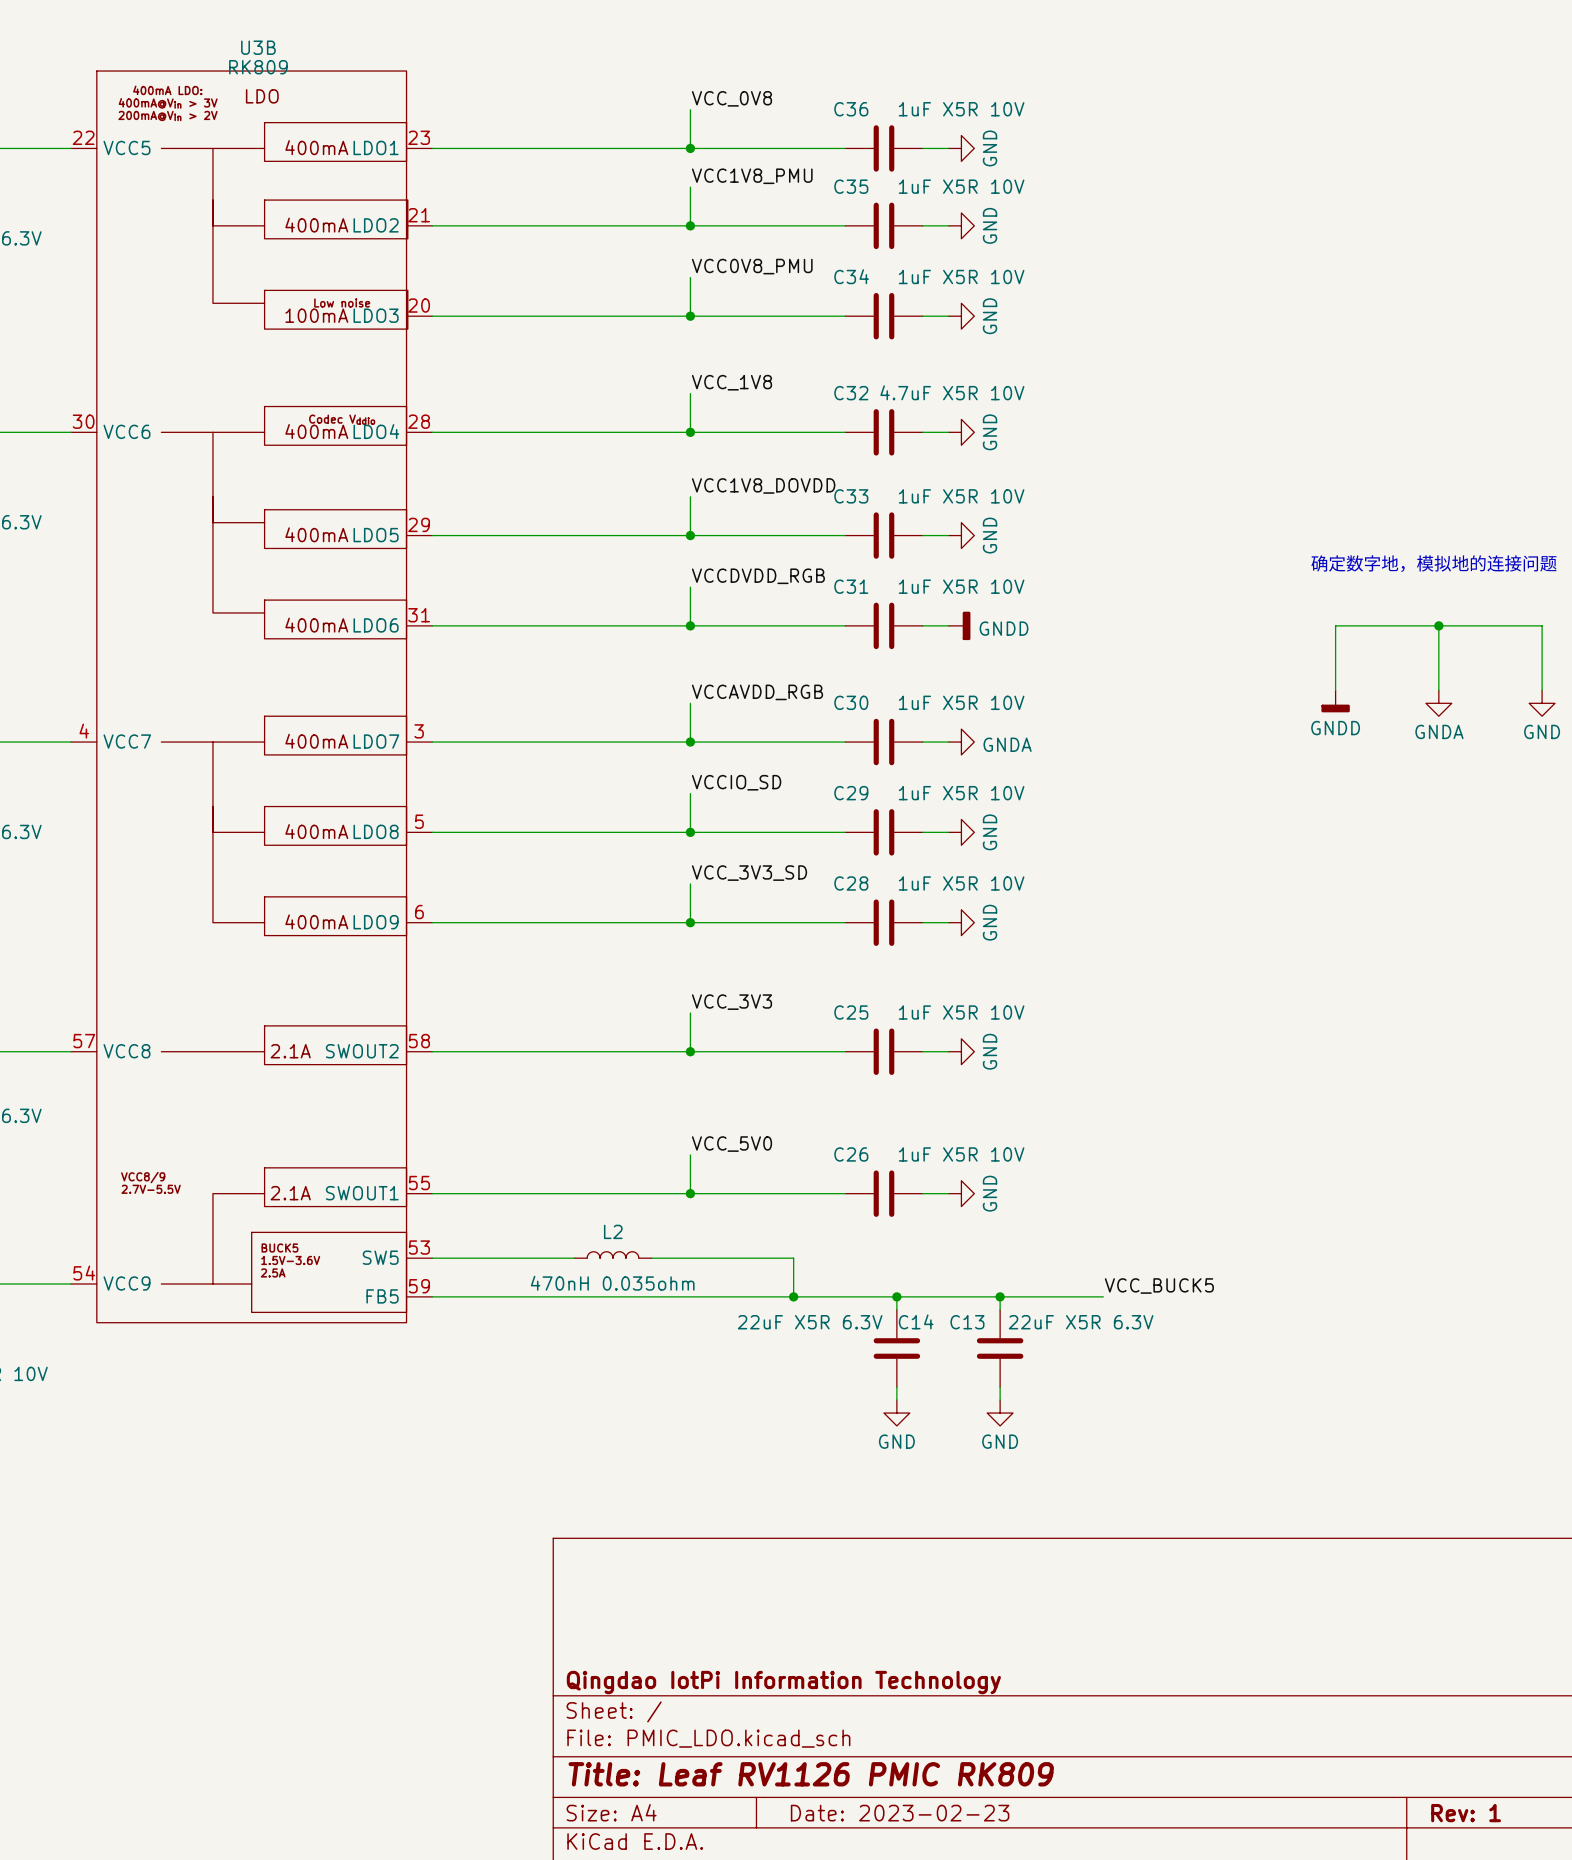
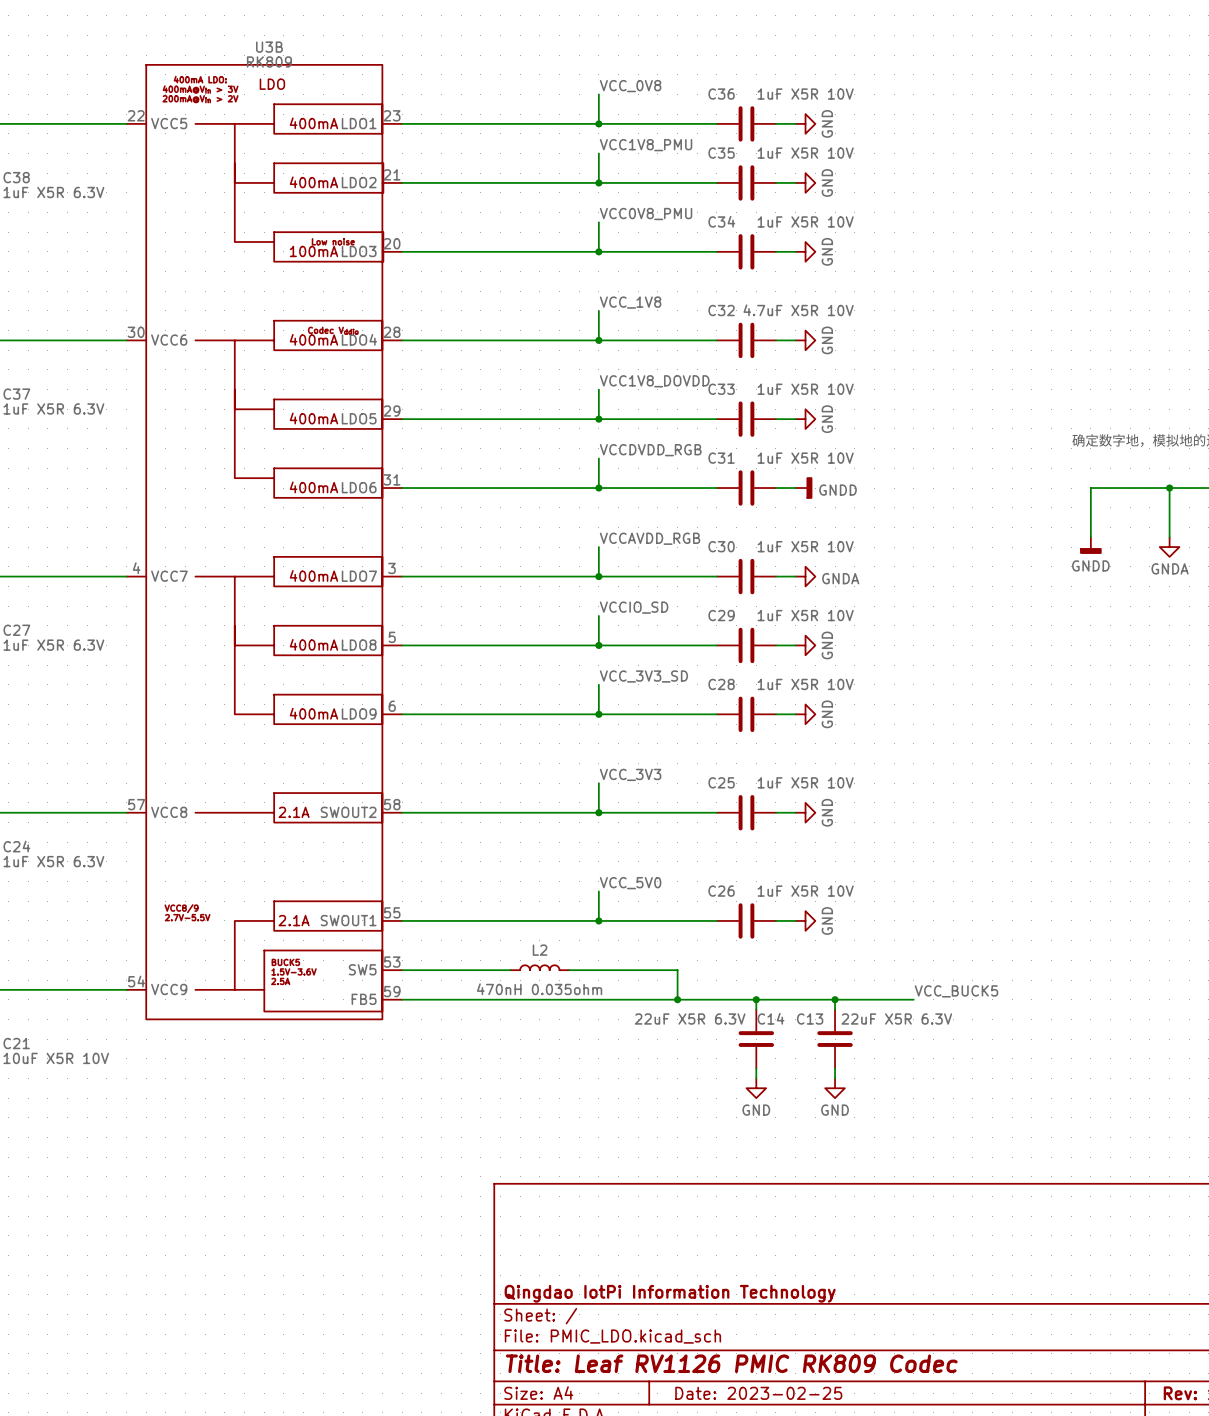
title block: Title: Leaf RV1126 PMIC RK809 (811, 1774) -> Title: Leaf RV1126 PMIC RK809 Codec (731, 1363)
title block: Date: 2023-02-23 (900, 1813) -> Date: 2023-02-25 (758, 1393)

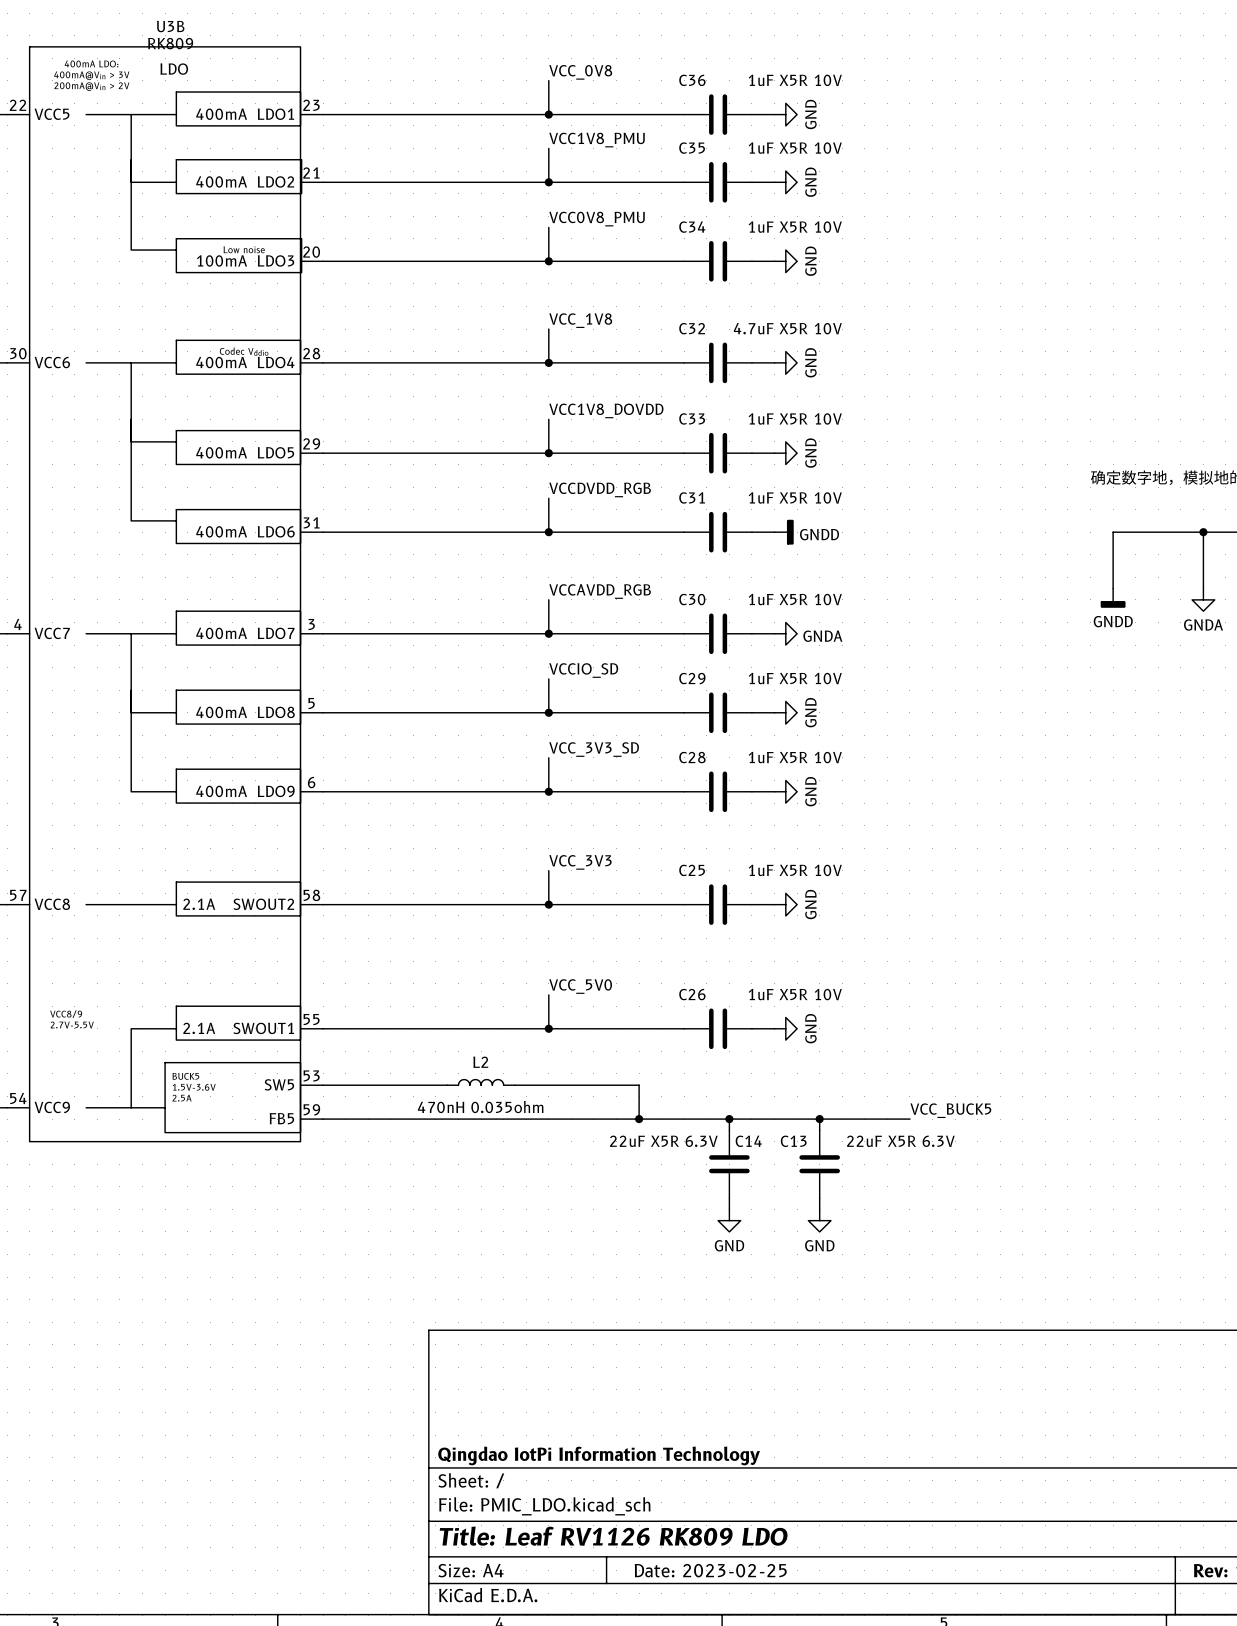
title block: Title: Leaf RV1126 PMIC RK809 Codec (731, 1363) -> Title: Leaf RV1126 RK809 LDO (613, 1536)

